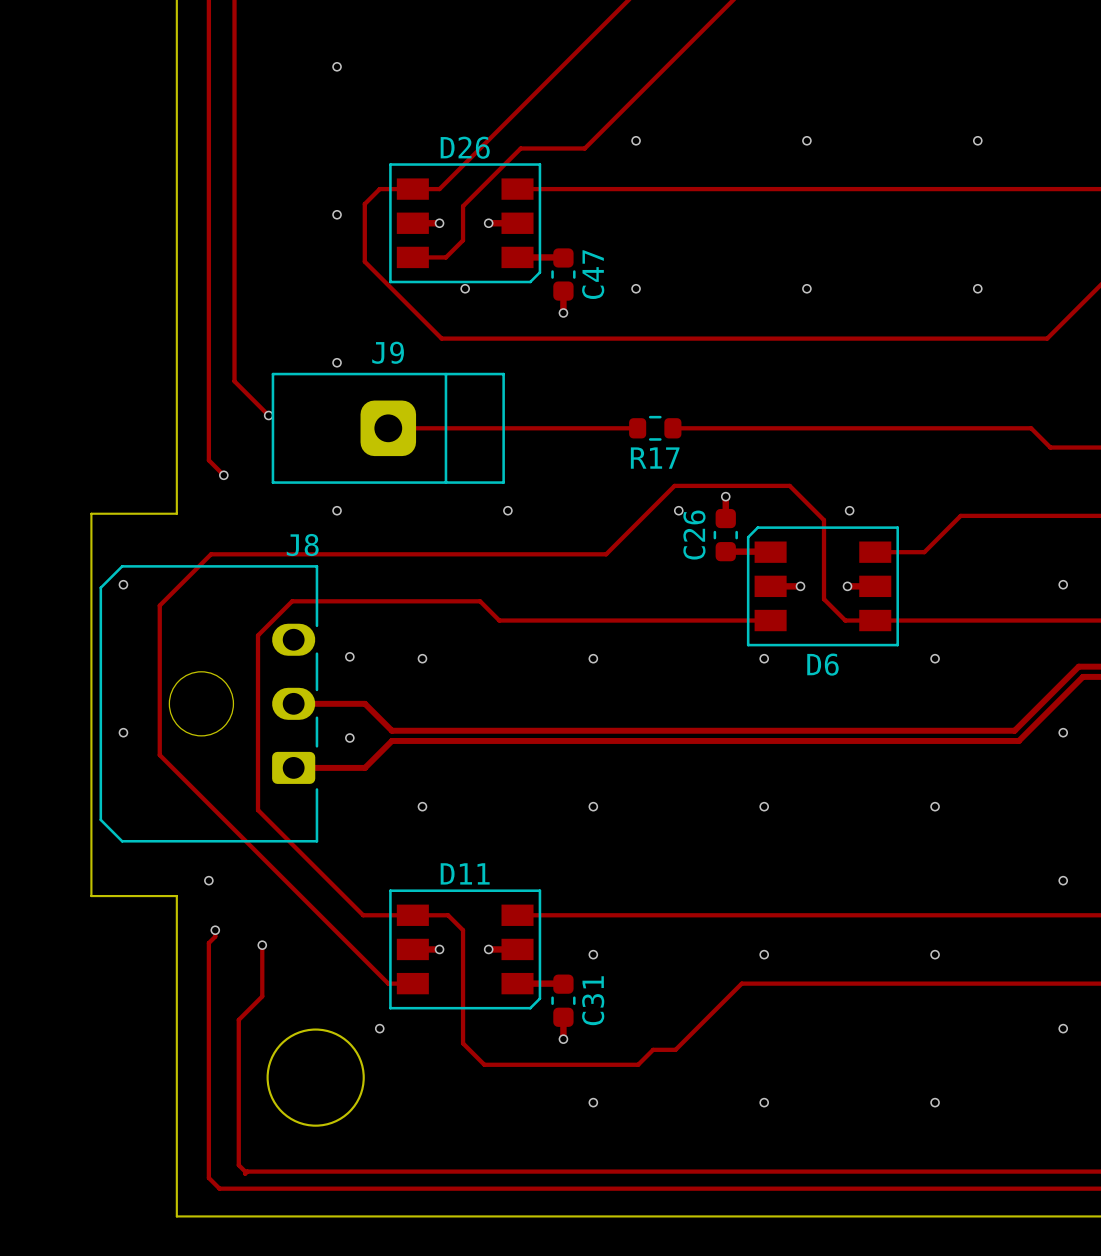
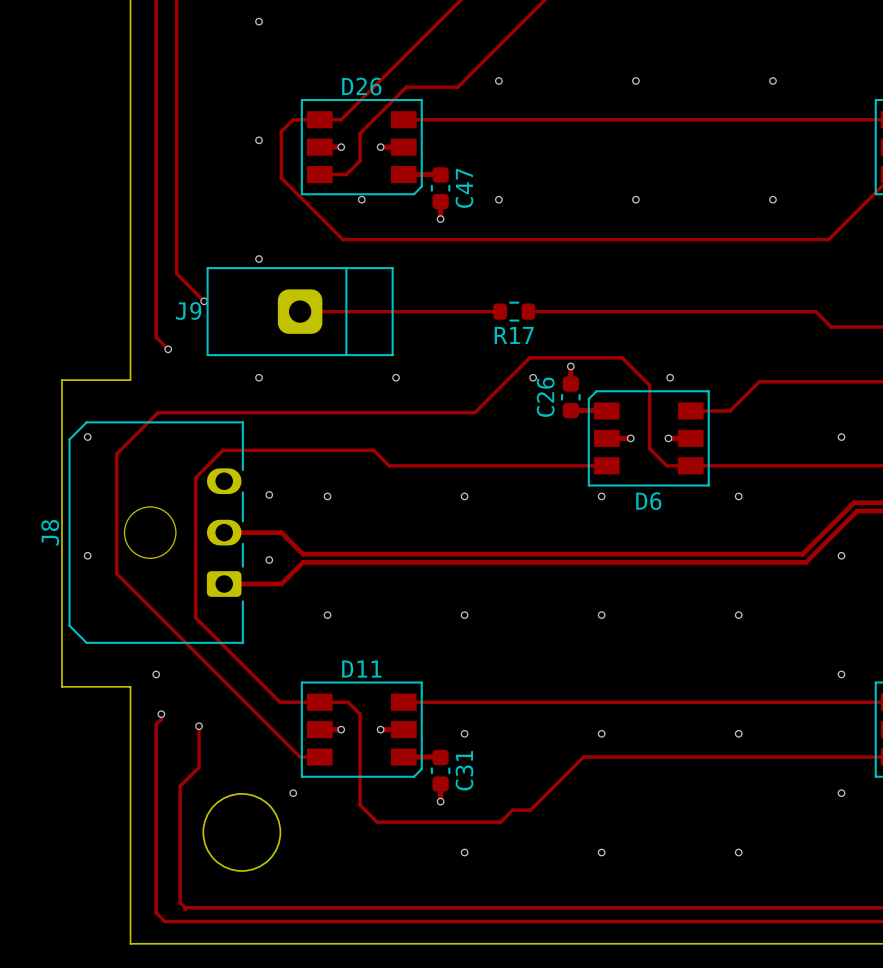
J9 name position: J9 (388, 352) -> J9 (188, 310)
J8 name rotation: 0° (302, 544) -> 90° counterclockwise (50, 532)
J8 name position: J8 (302, 544) -> J8 (50, 532)

